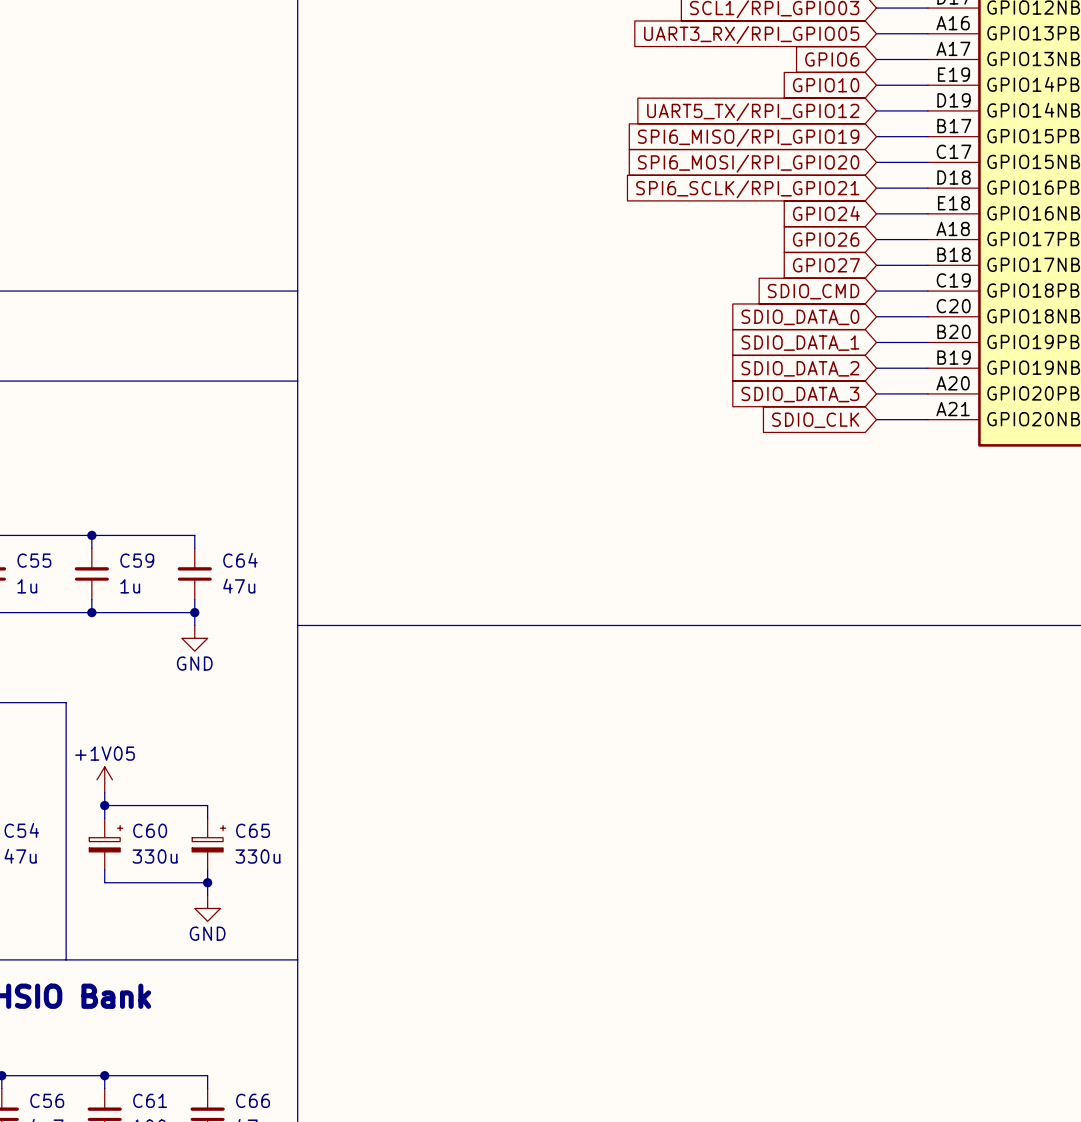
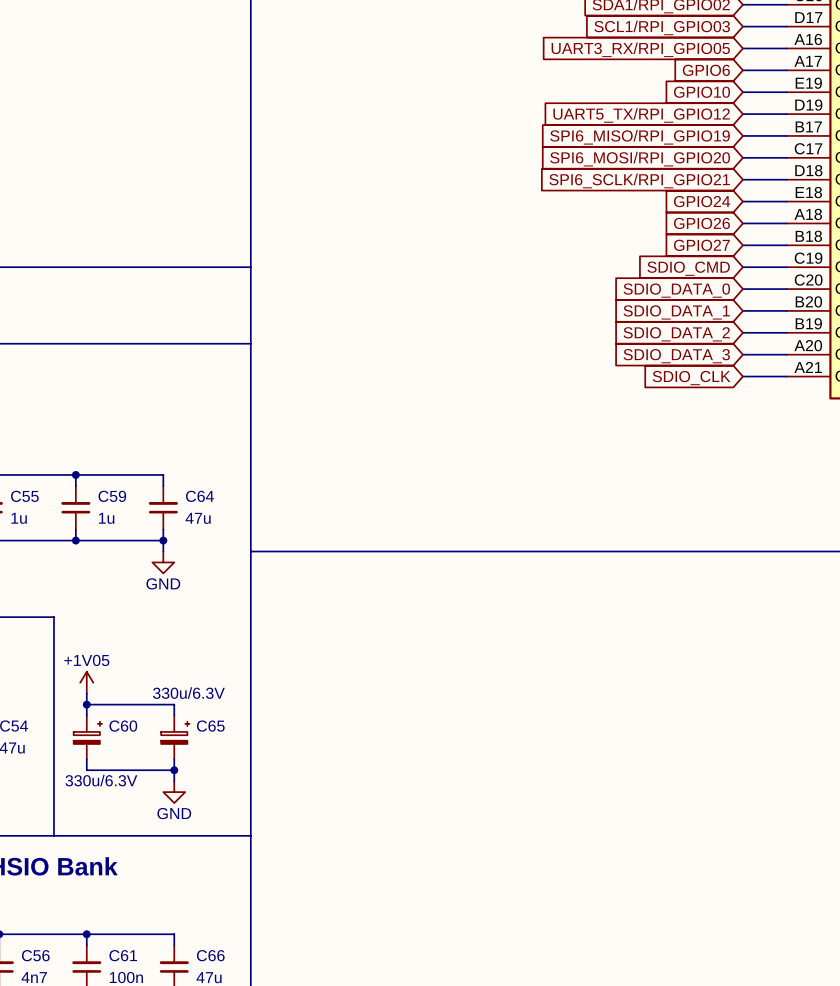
C65 text: none -> 330u/6.3V (188, 693)
C60 text: 330u (155, 856) -> none
C65 text: 330u (257, 856) -> none
C60 text: none -> 330u/6.3V (101, 780)

